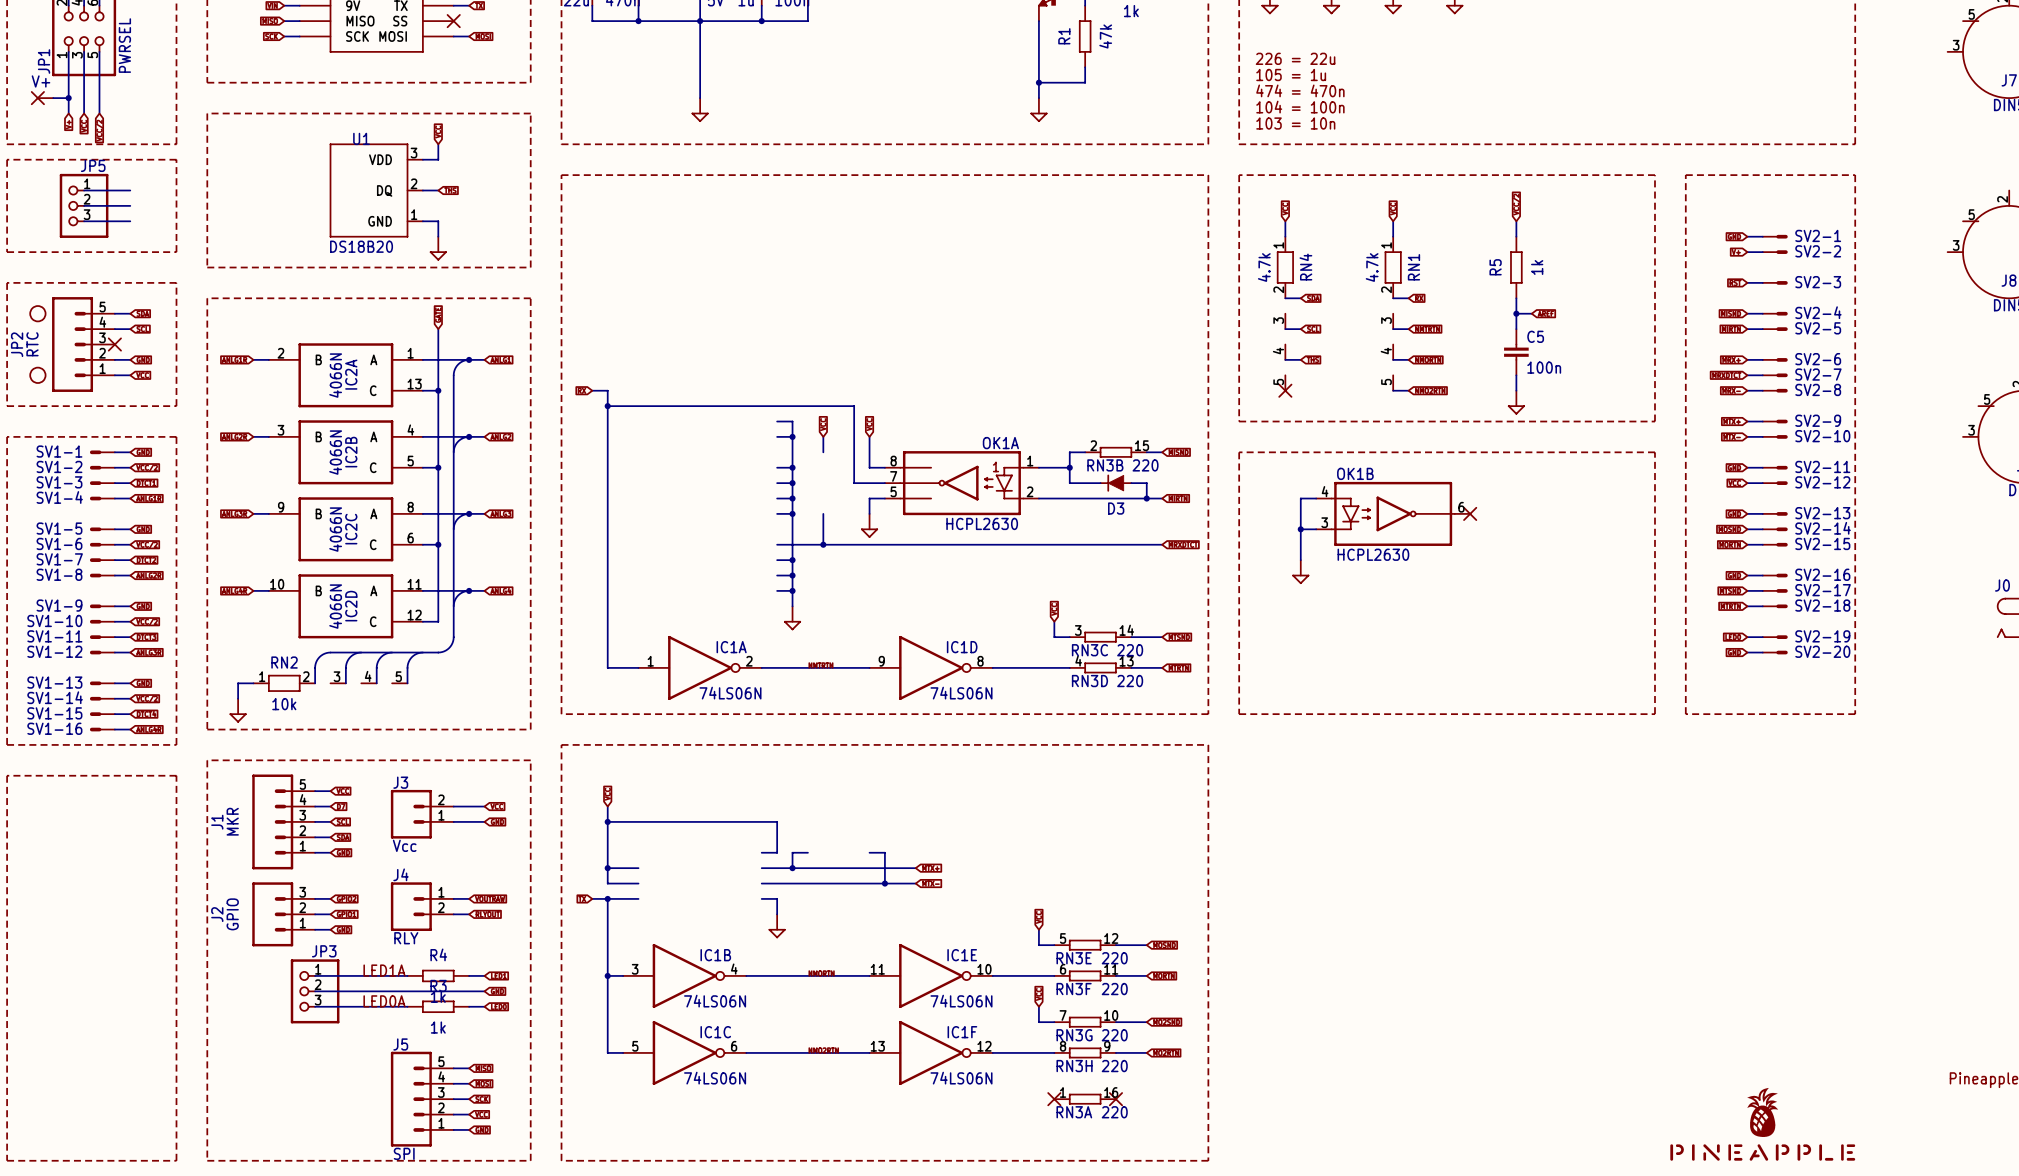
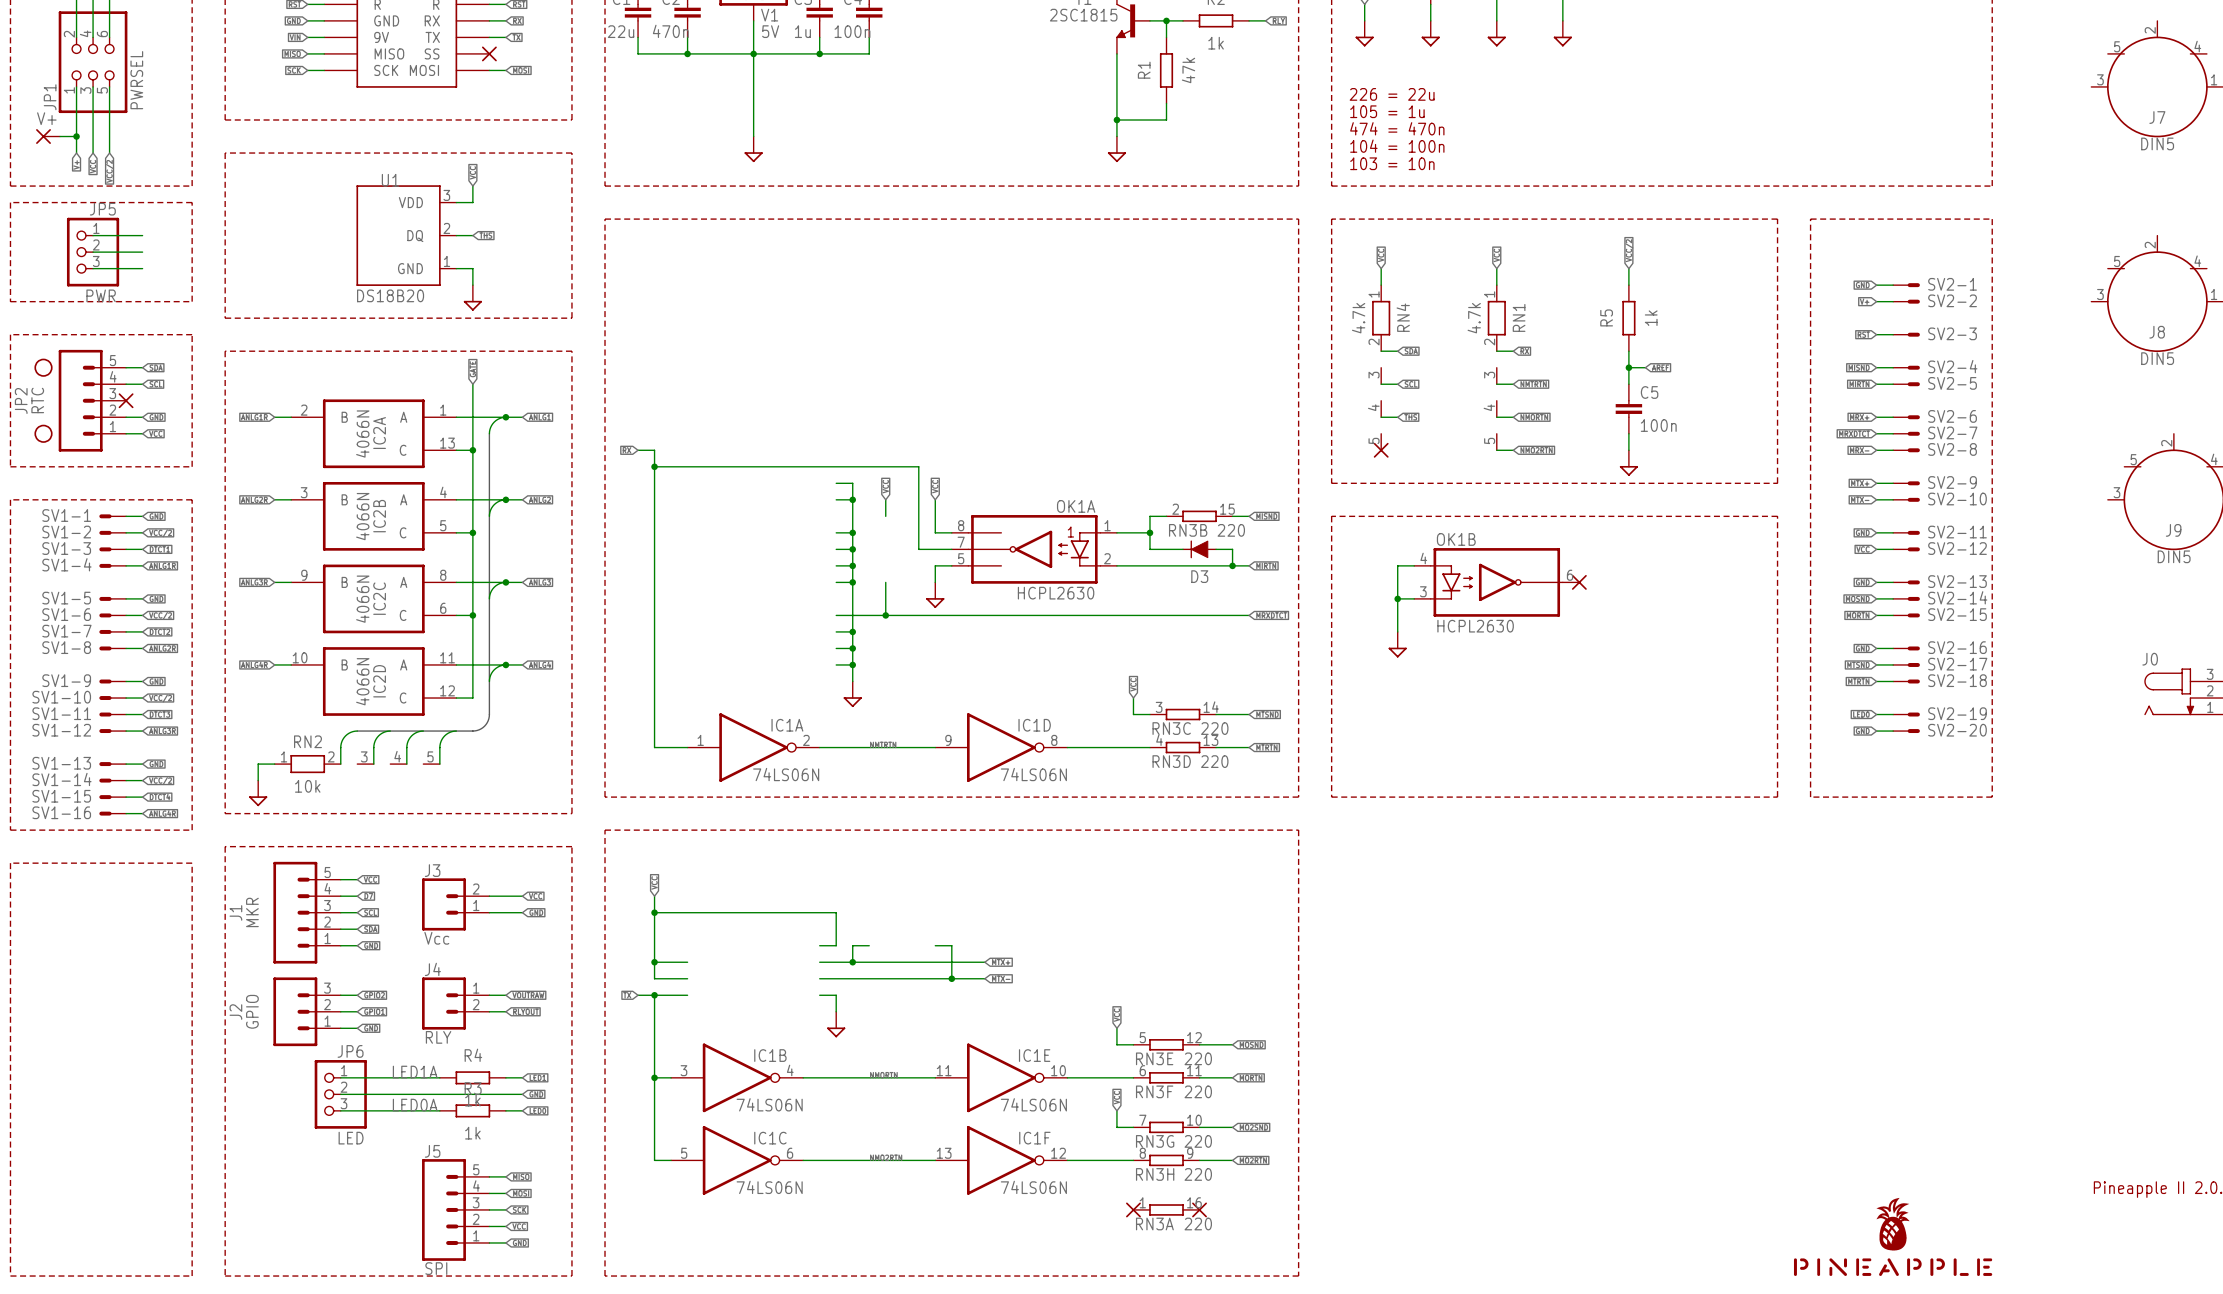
JP5 value: none -> PWR (101, 295)
JP3 name: JP3 (324, 951) -> JP6 (350, 1051)
JP3 value: none -> LED (351, 1138)

